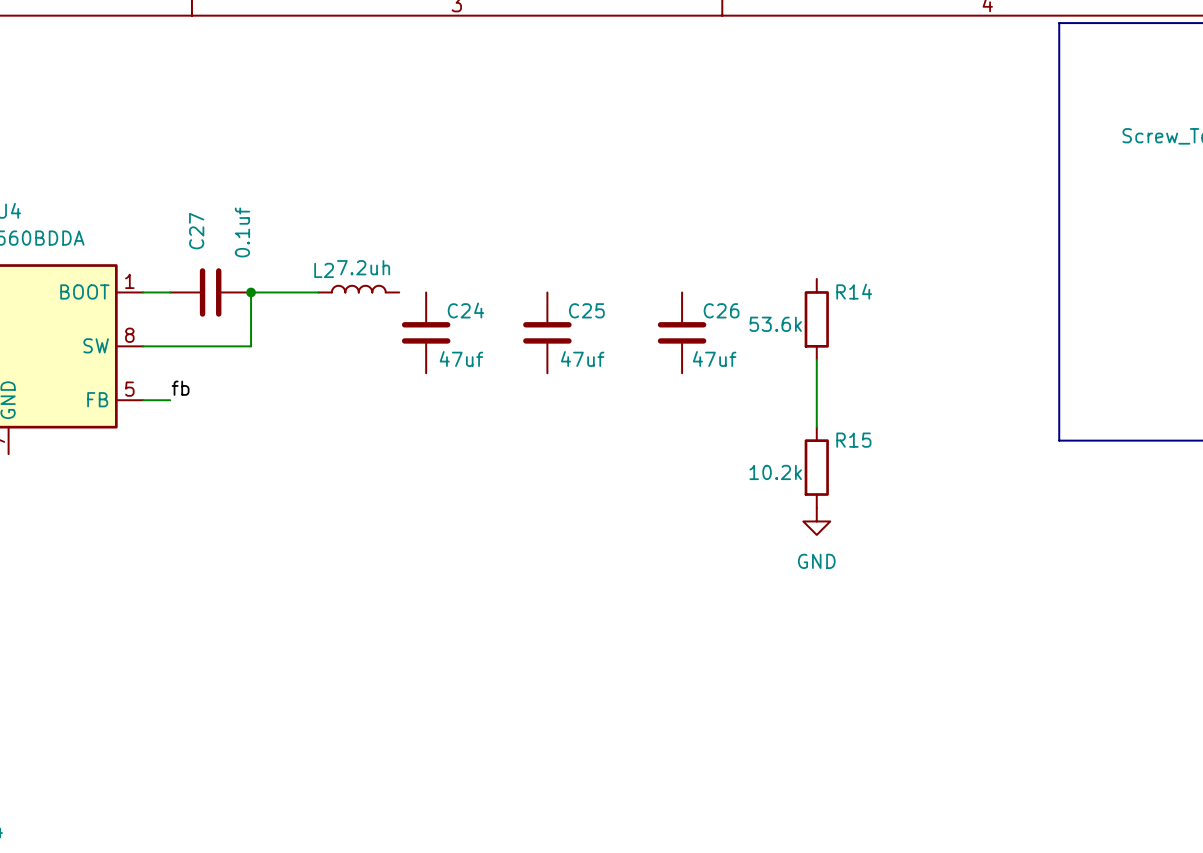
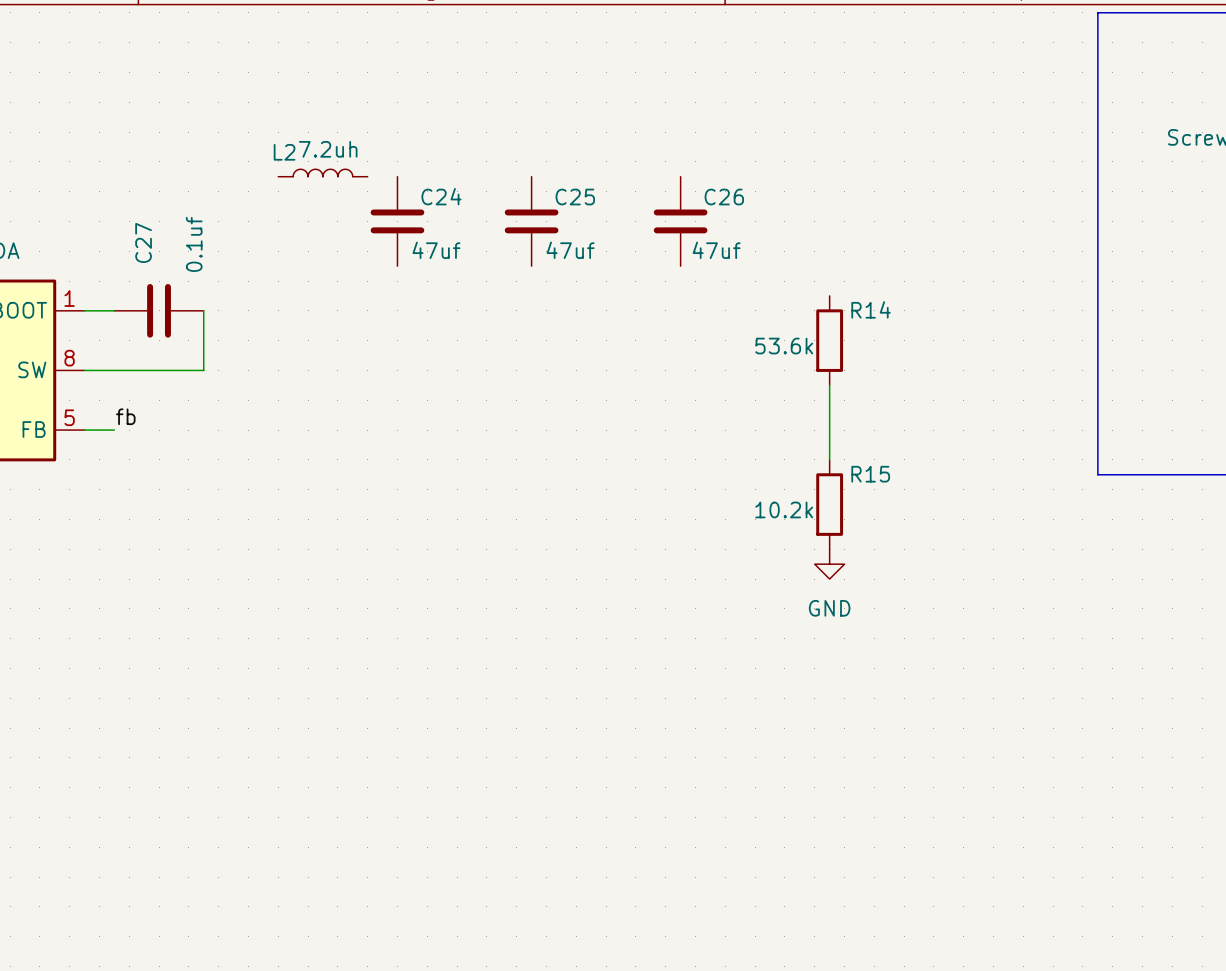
L2 position: (358, 289) -> (322, 173)
wire: (251, 292) (318, 292) -> none
junction: (251, 292) -> none
C24 position: (426, 332) -> (397, 221)
C25 position: (547, 332) -> (531, 221)
C26 position: (682, 332) -> (680, 221)

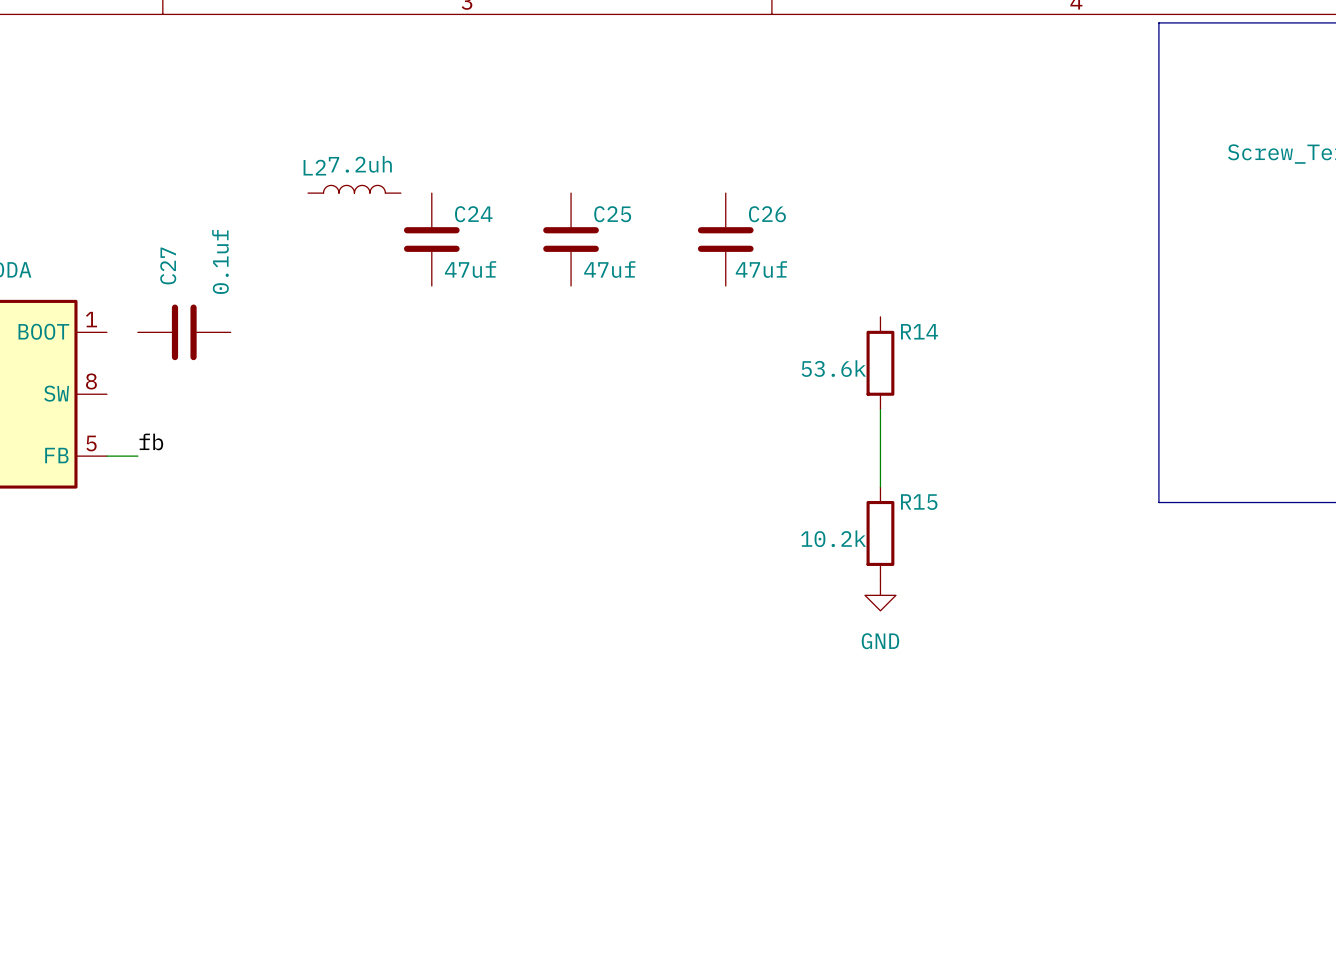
wire: (84, 310) (114, 310) -> none
wire: (203, 310) (203, 370) (84, 370) -> none

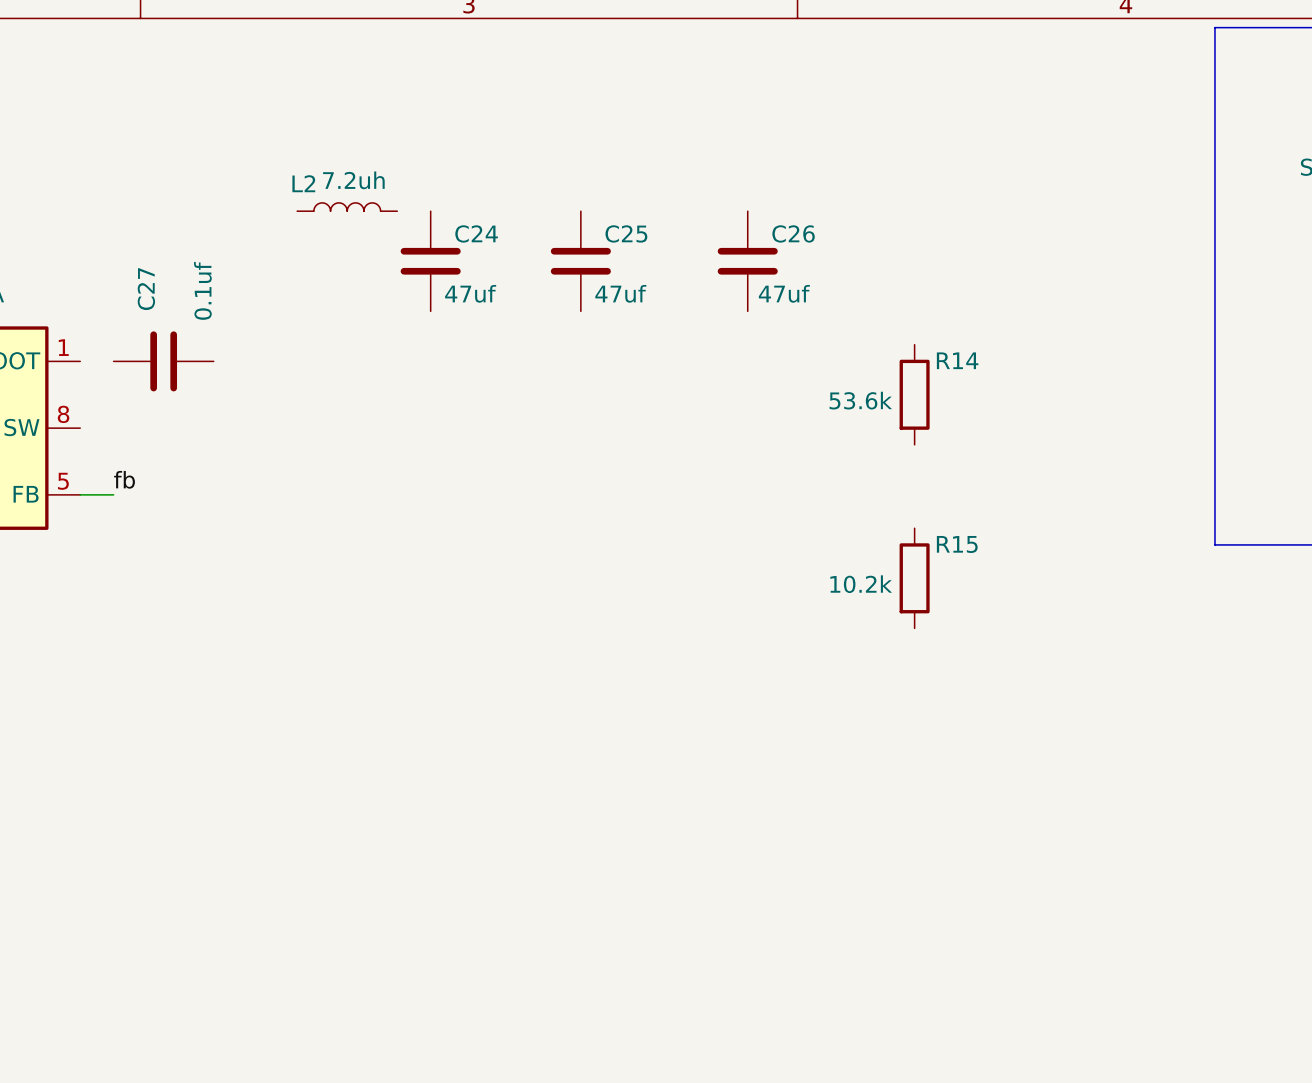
wire: (880, 409) (880, 487) -> none
power symbol: GND (880, 595) -> none

